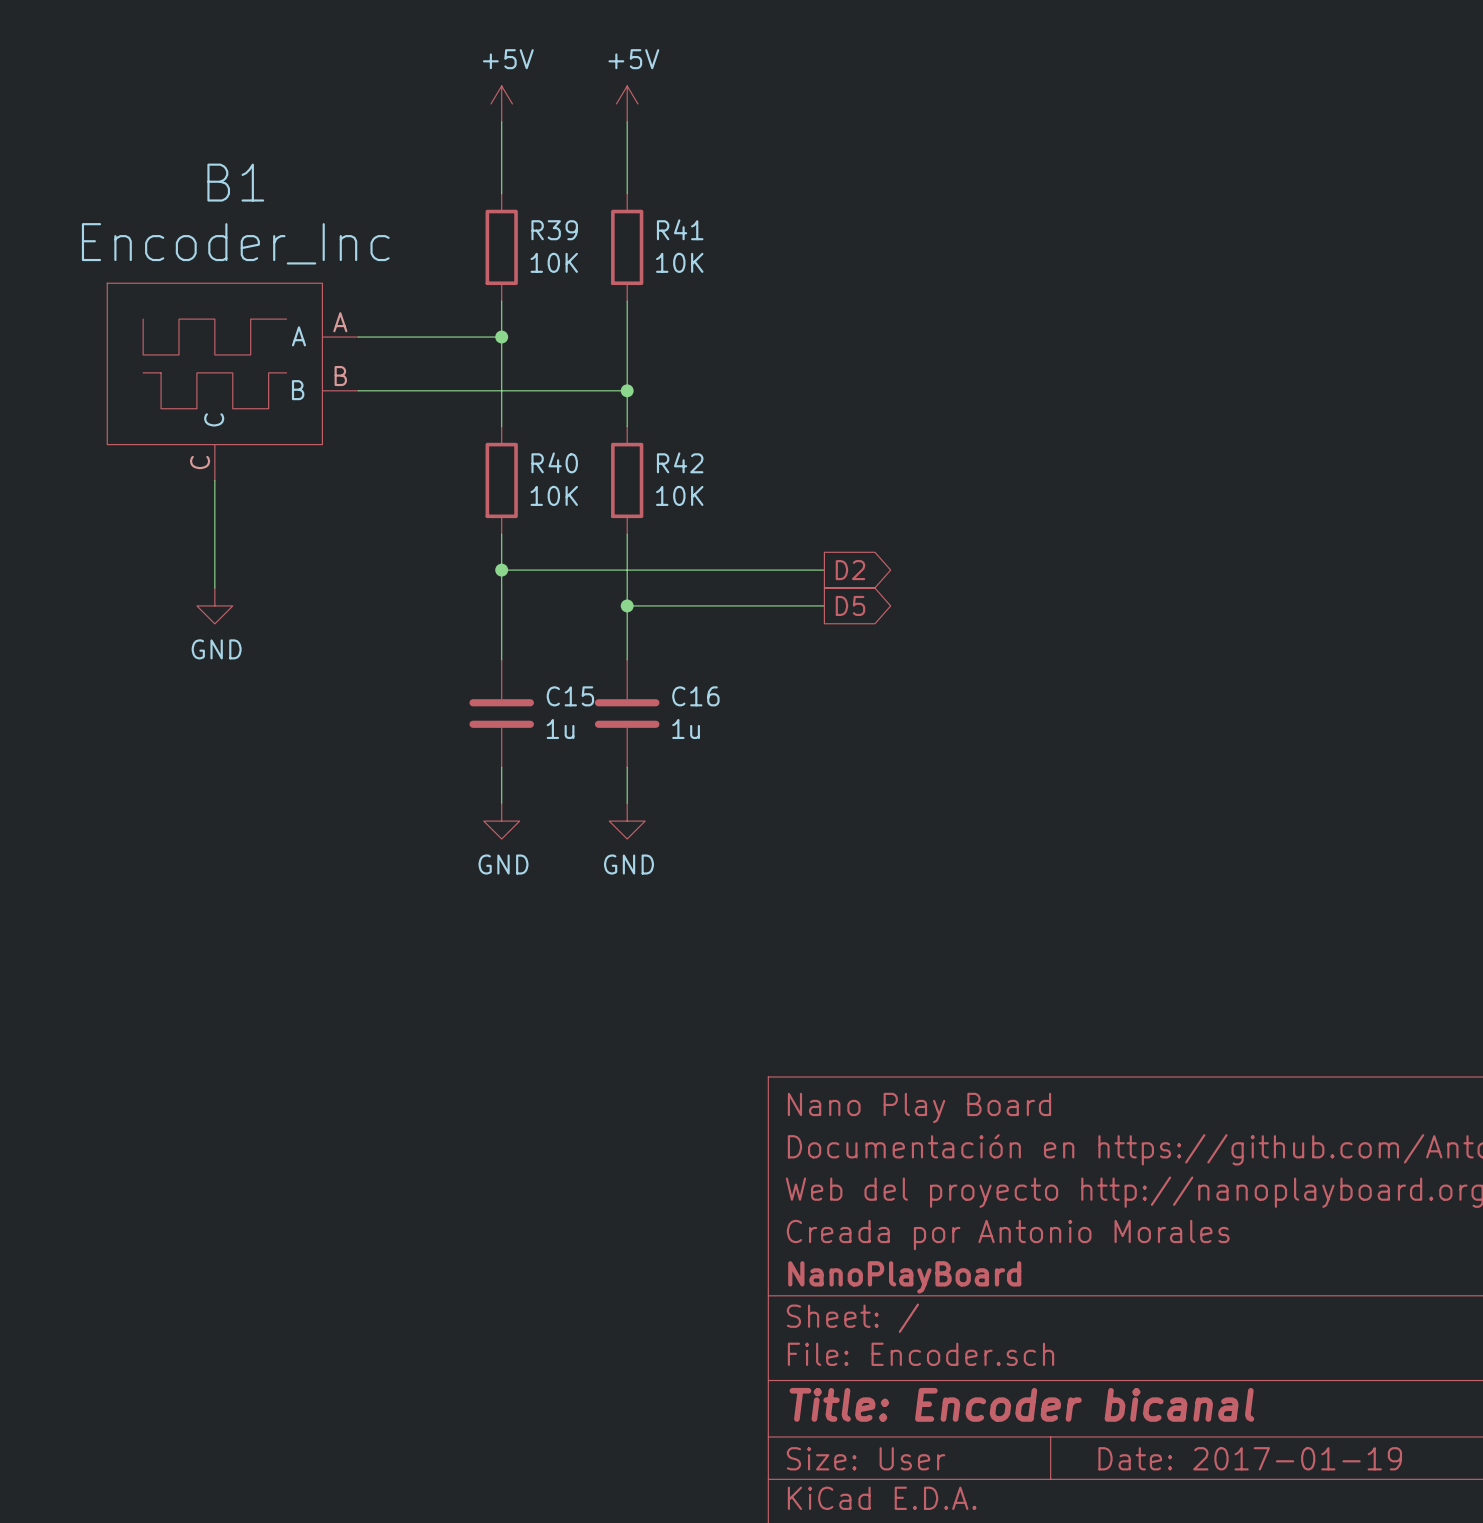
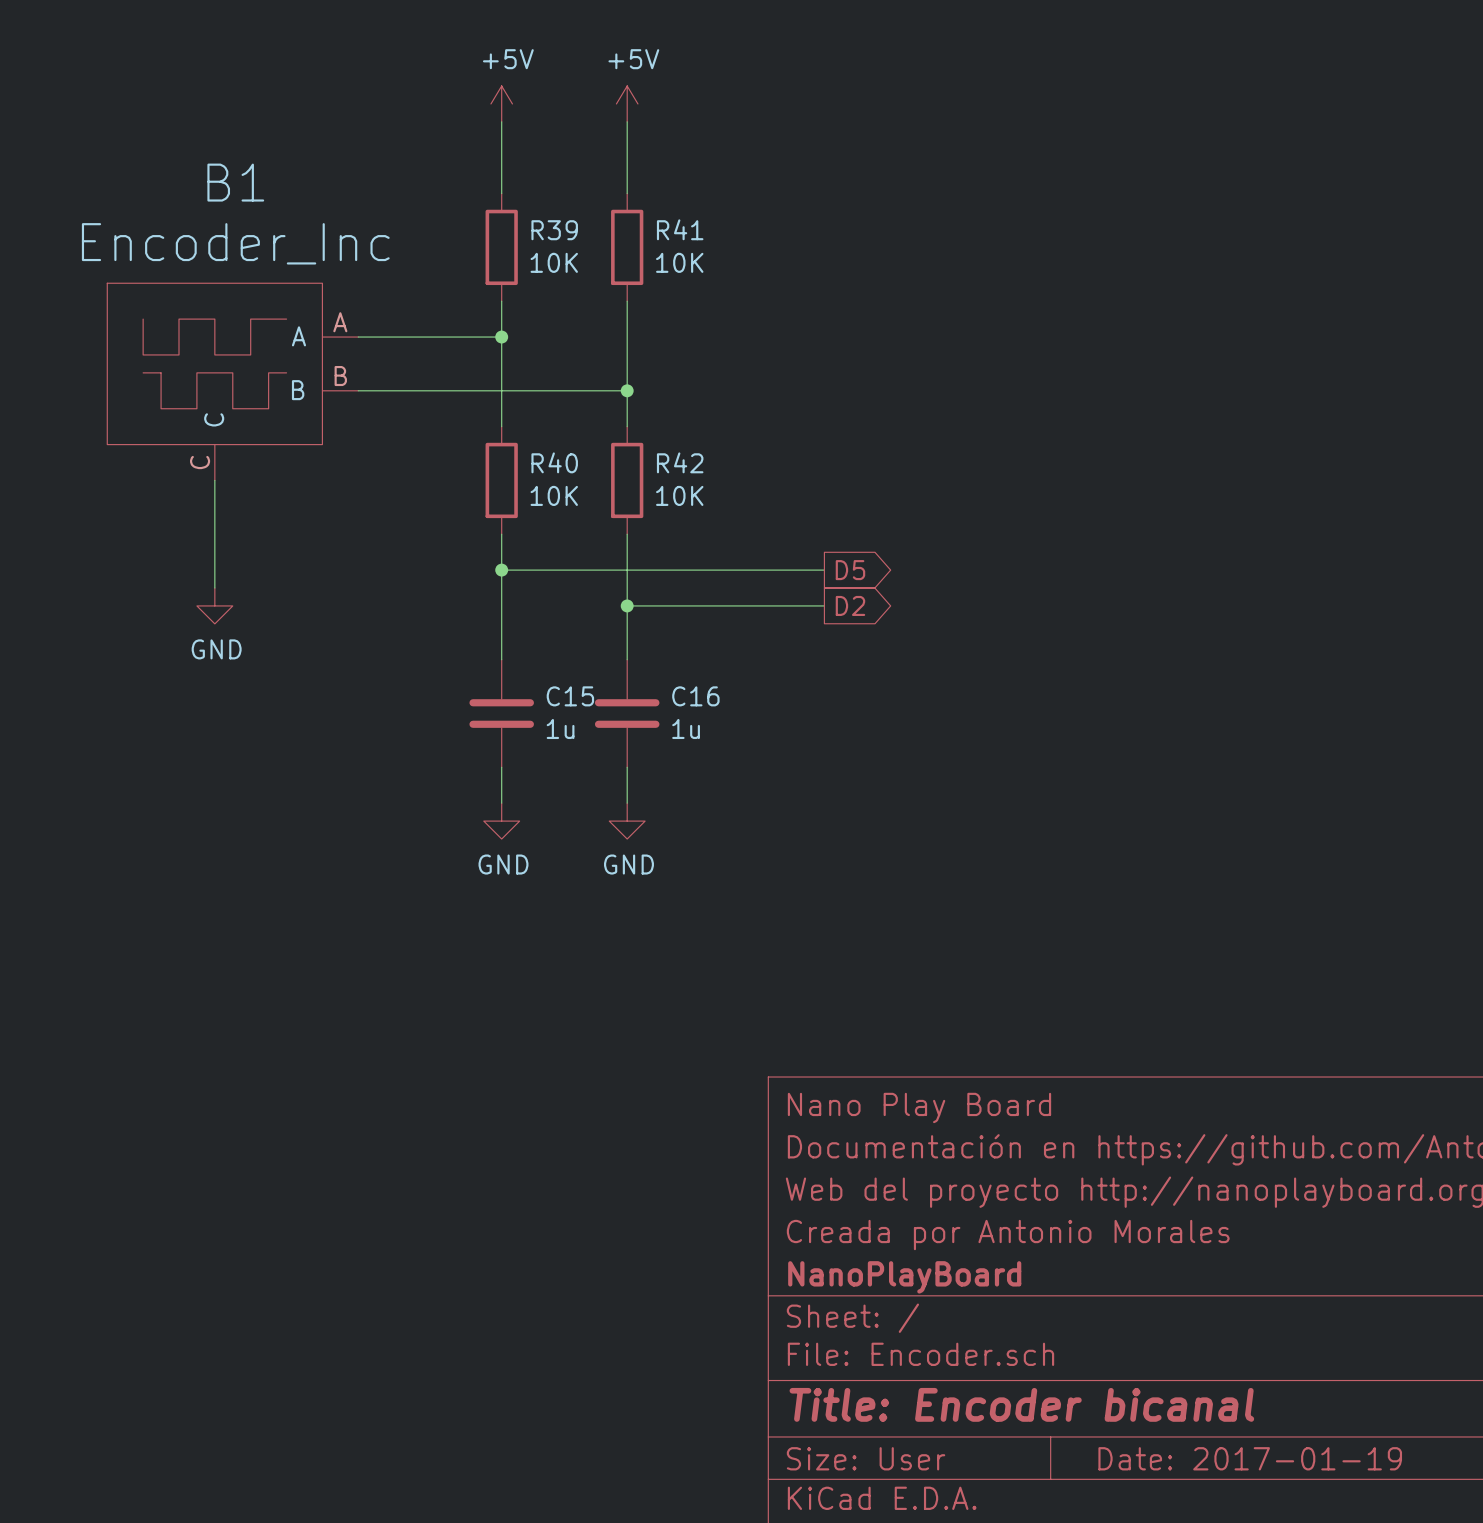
global label: D2 (850, 570) -> D5 (850, 570)
global label: D5 (850, 605) -> D2 (850, 605)

